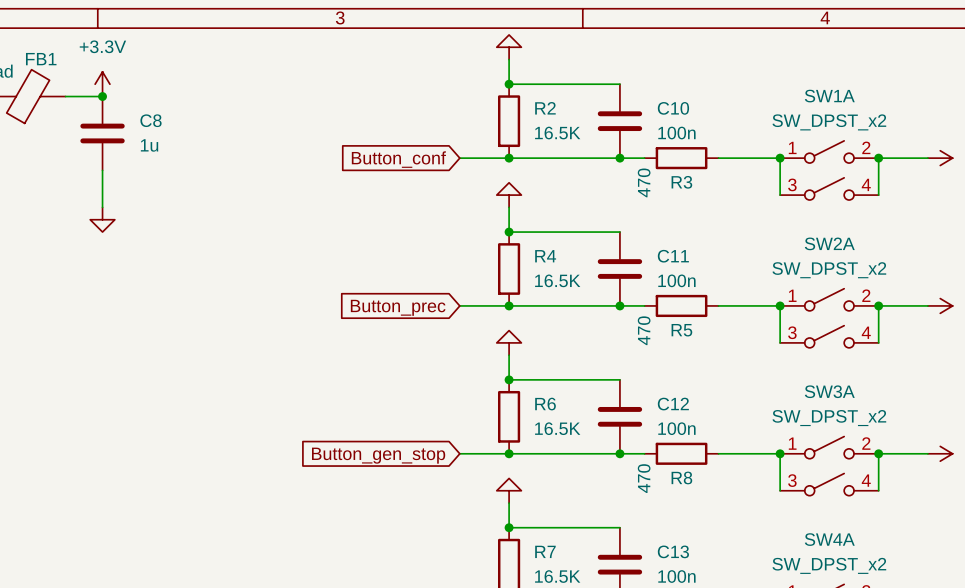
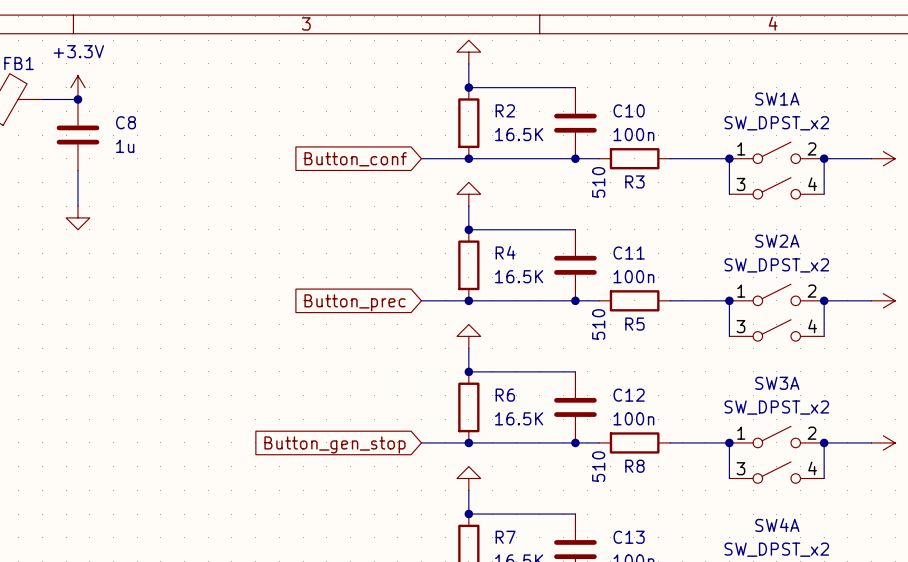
R3 value: 470 (644, 182) -> 510 (598, 182)
R5 value: 470 (644, 330) -> 510 (598, 324)
R8 value: 470 (644, 478) -> 510 (598, 466)

